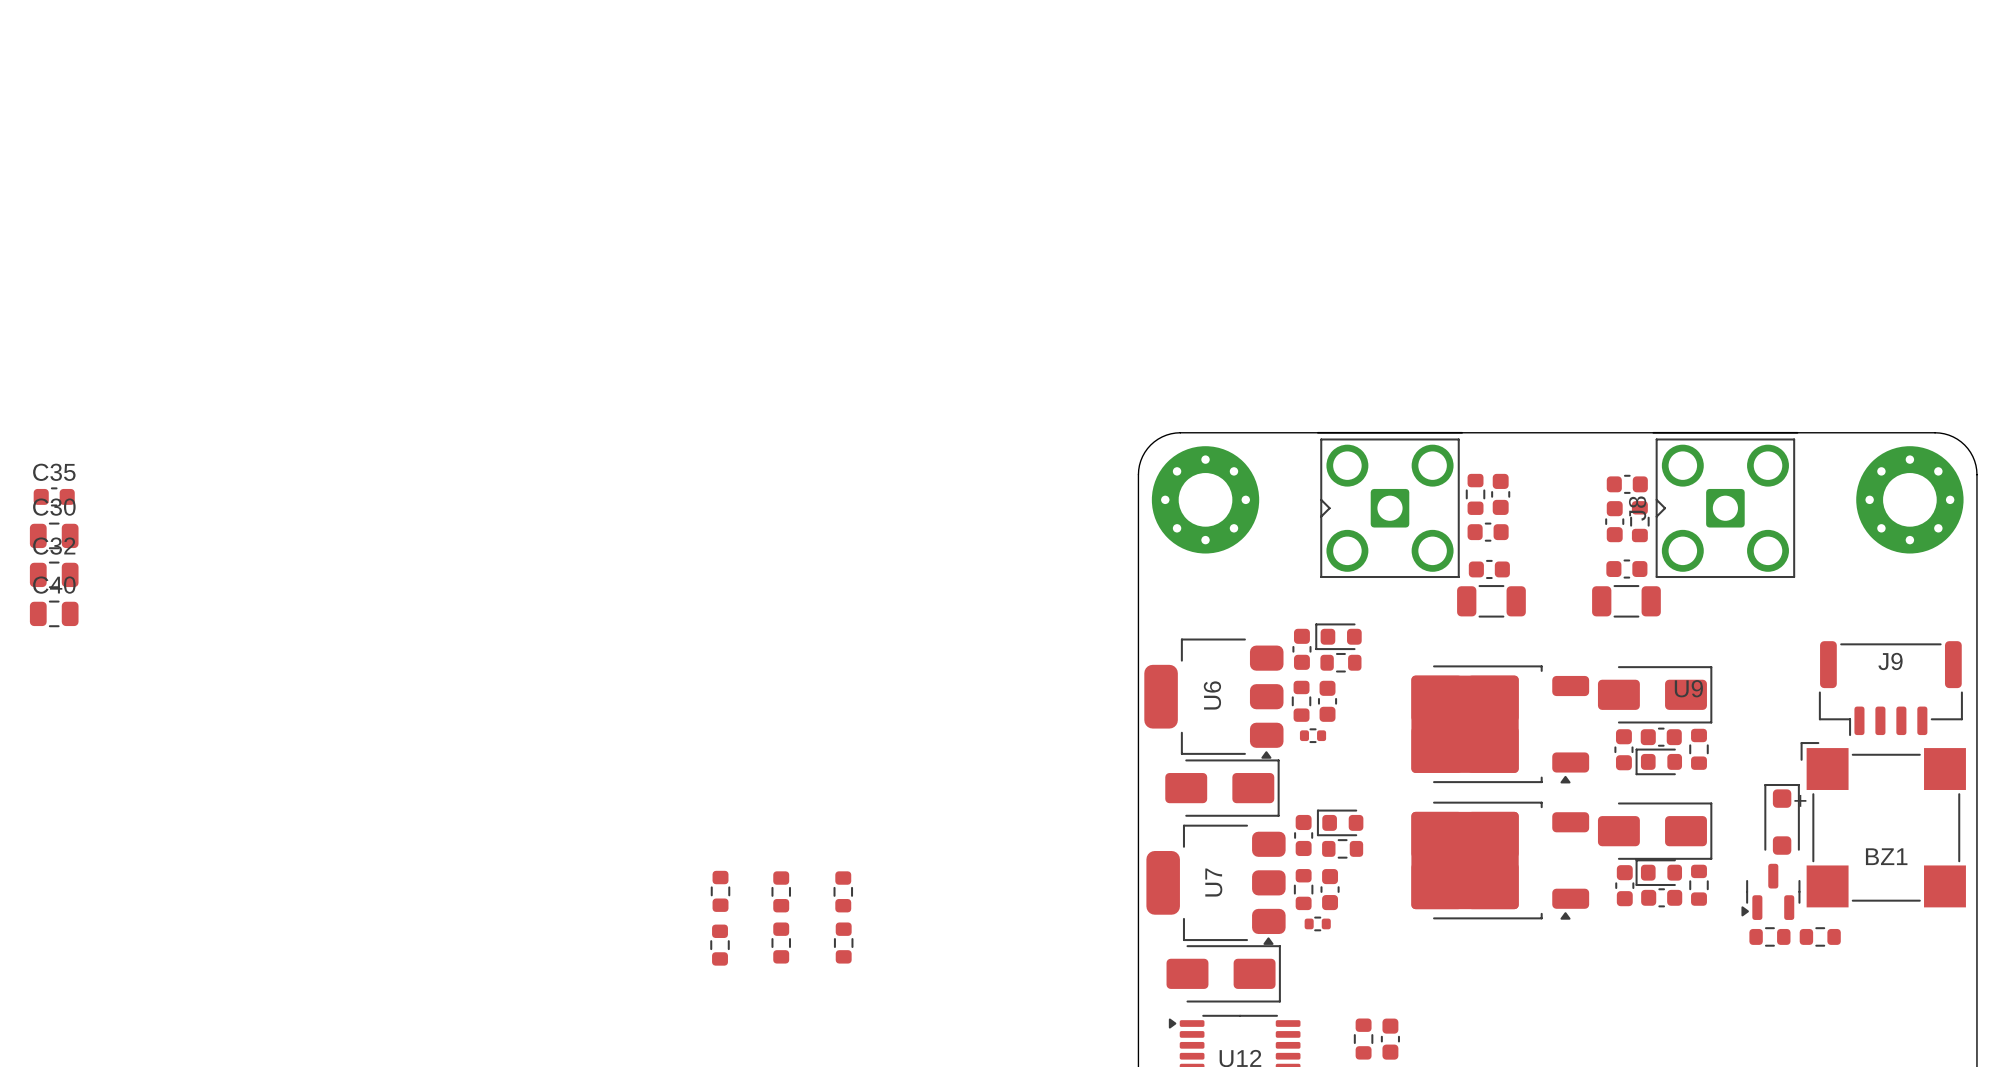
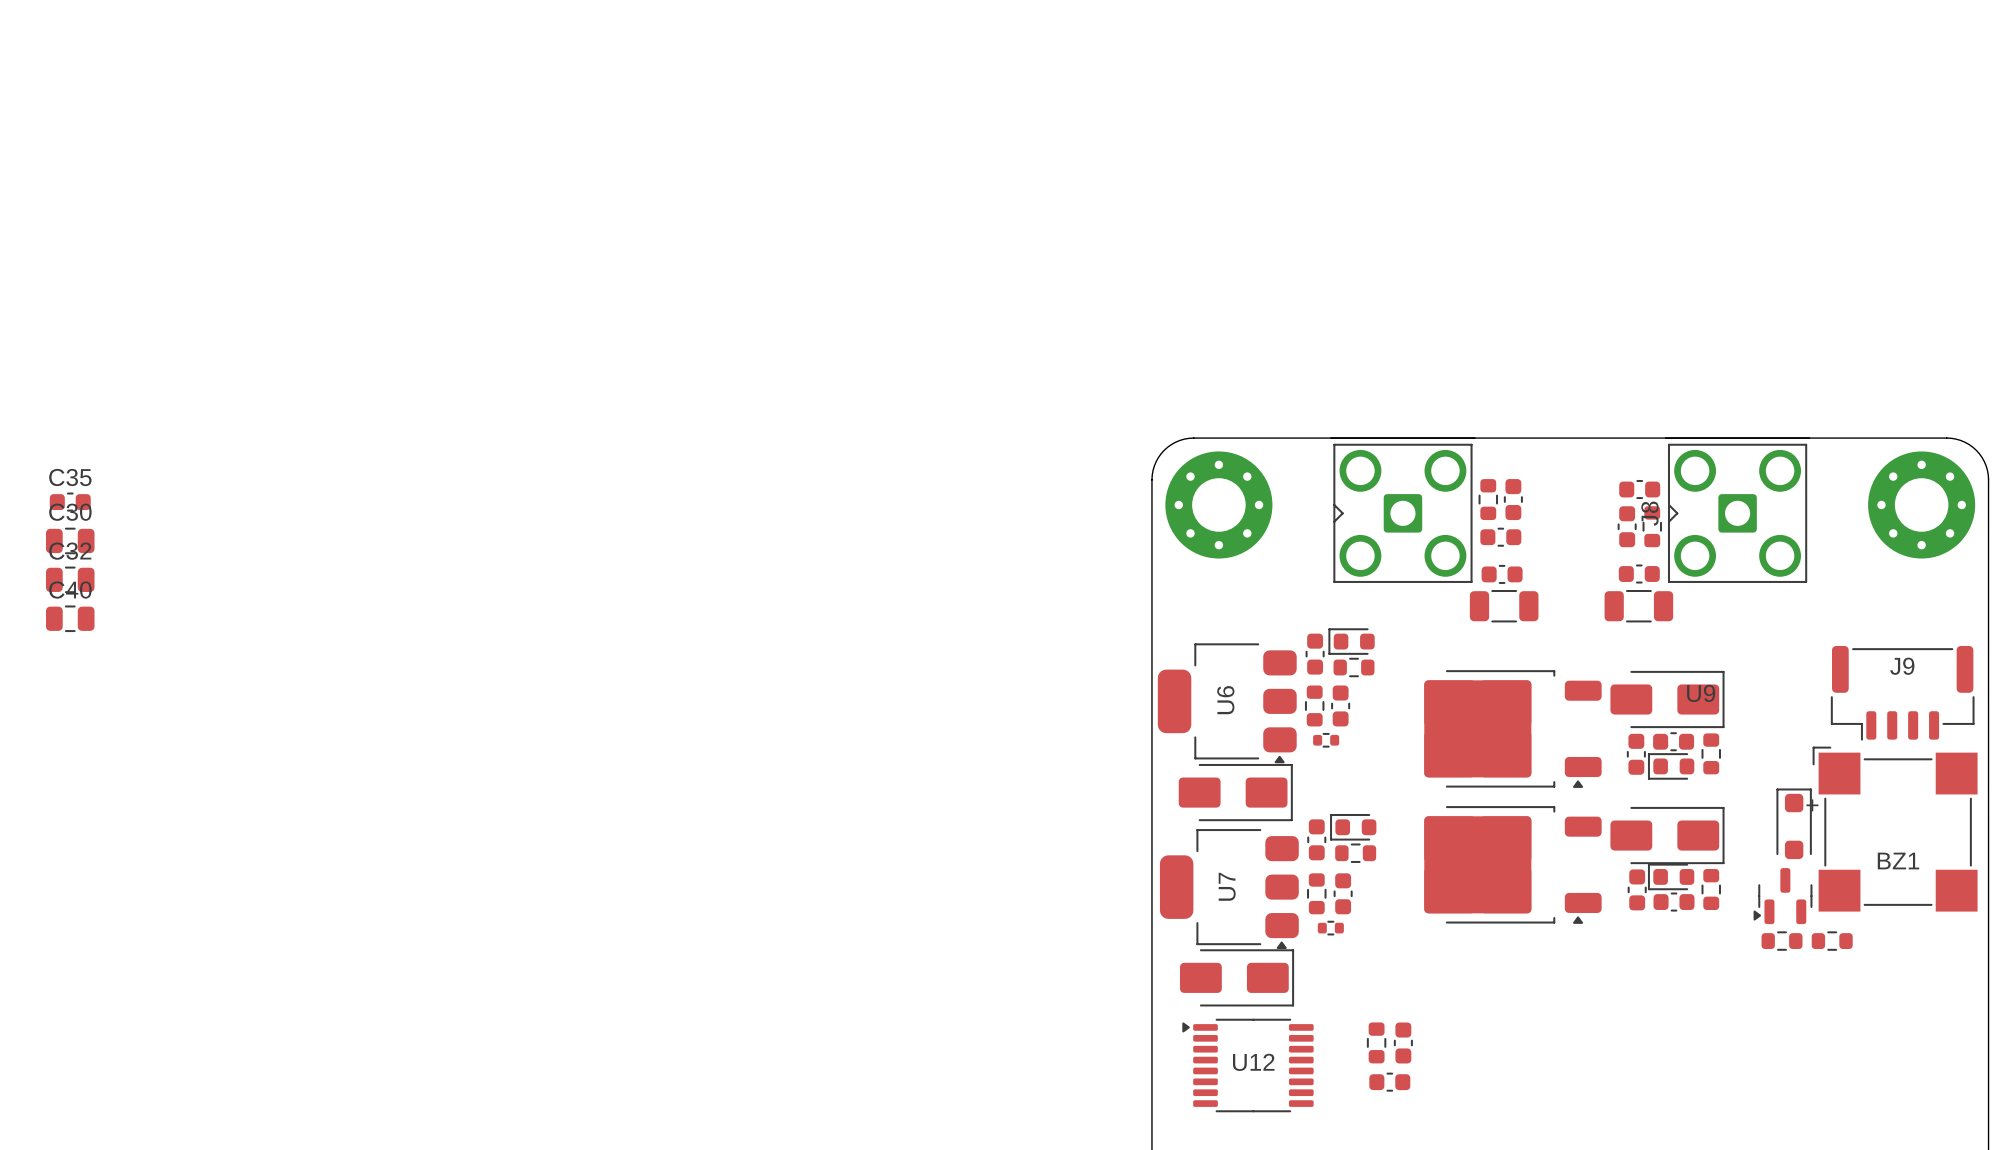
part: (720, 891) -> none
part: (781, 891) -> none
part: (843, 891) -> none
part: (781, 943) -> none
part: (843, 943) -> none
part: (720, 945) -> none

